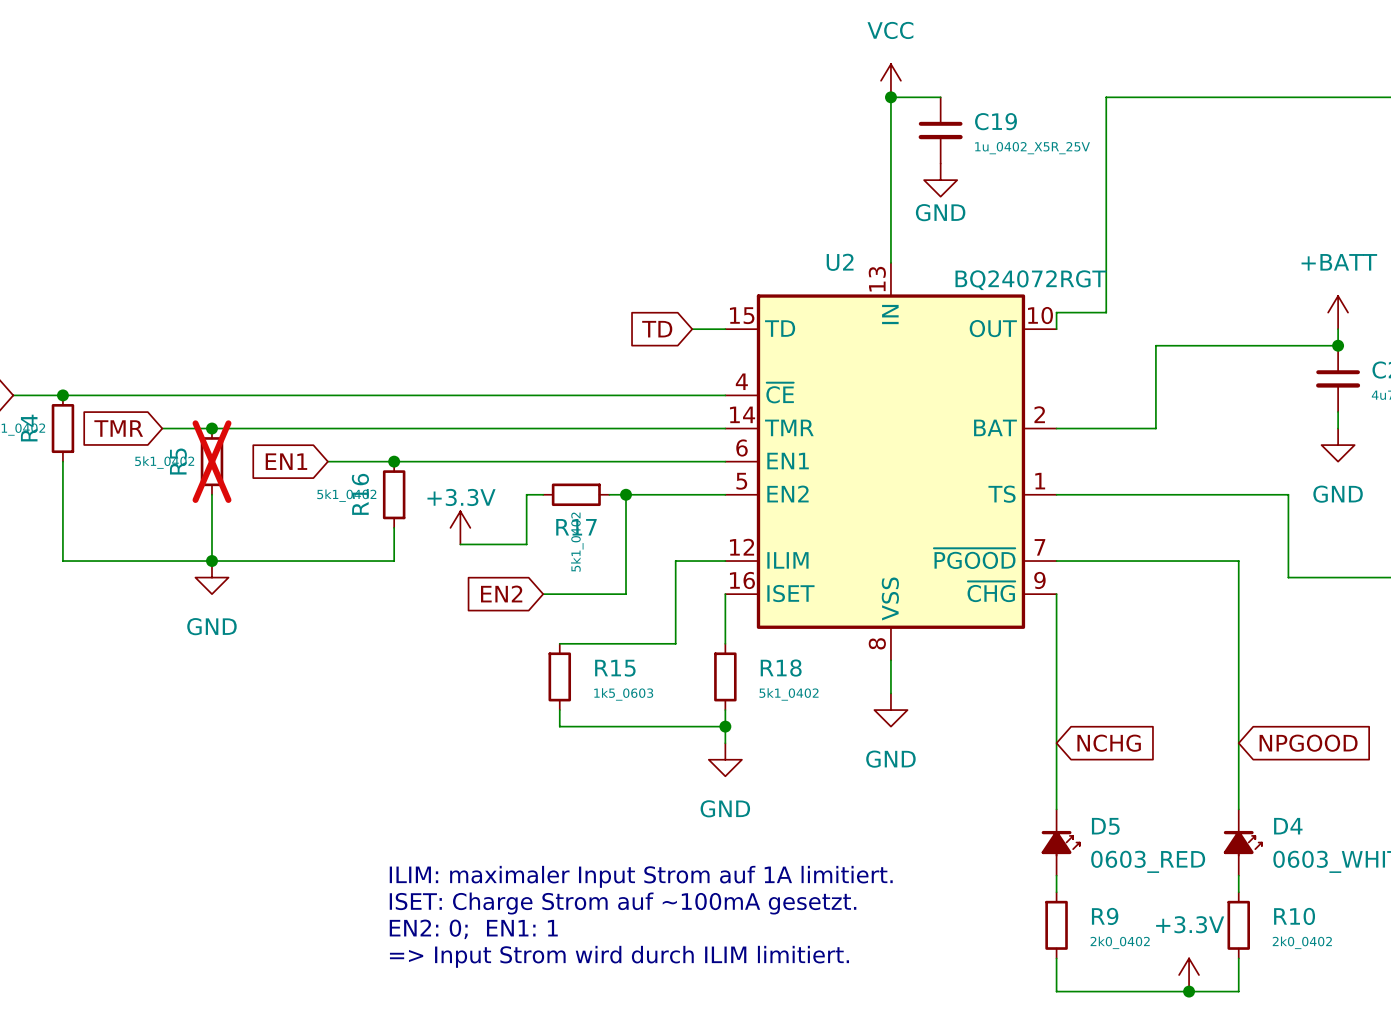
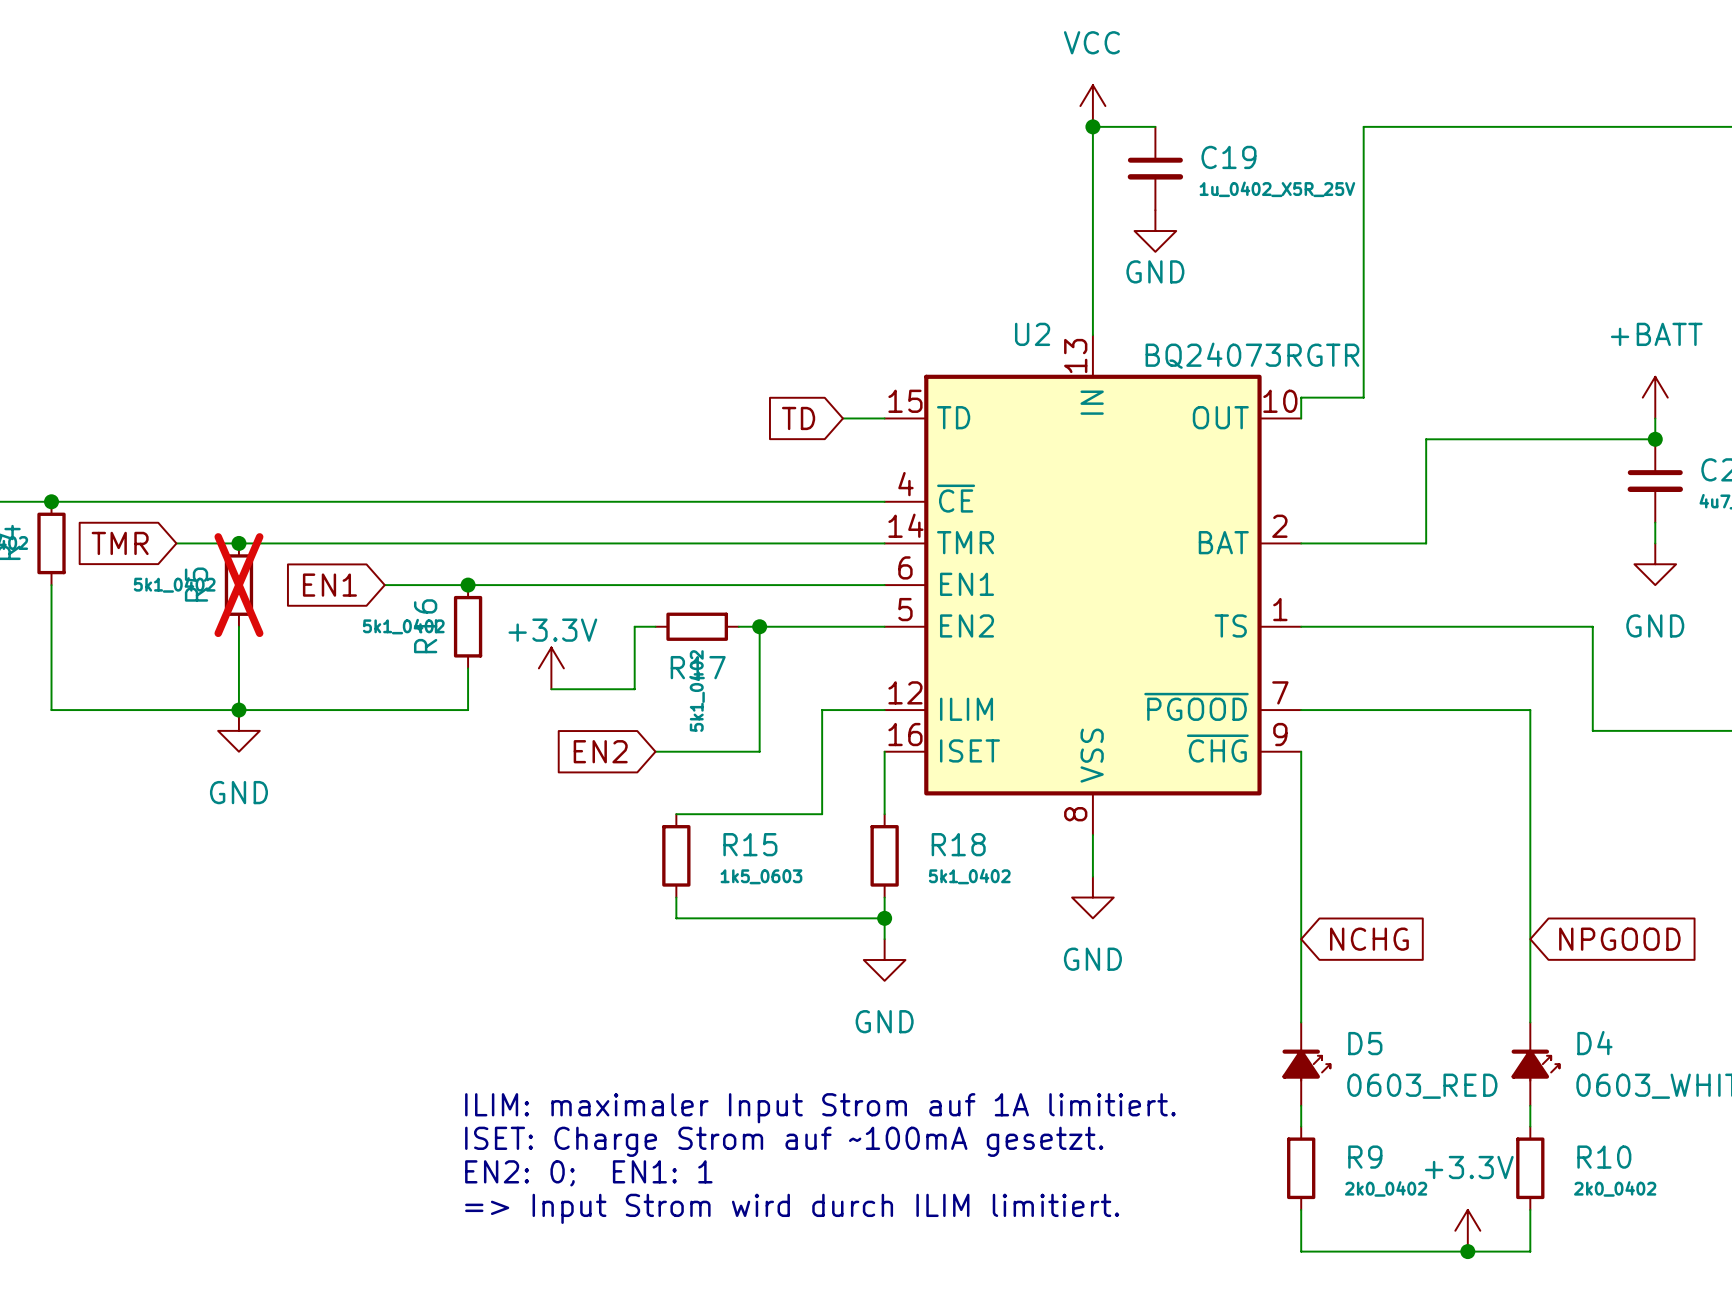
U2 value: BQ24072RGT (1030, 280) -> BQ24073RGTR (1252, 355)

